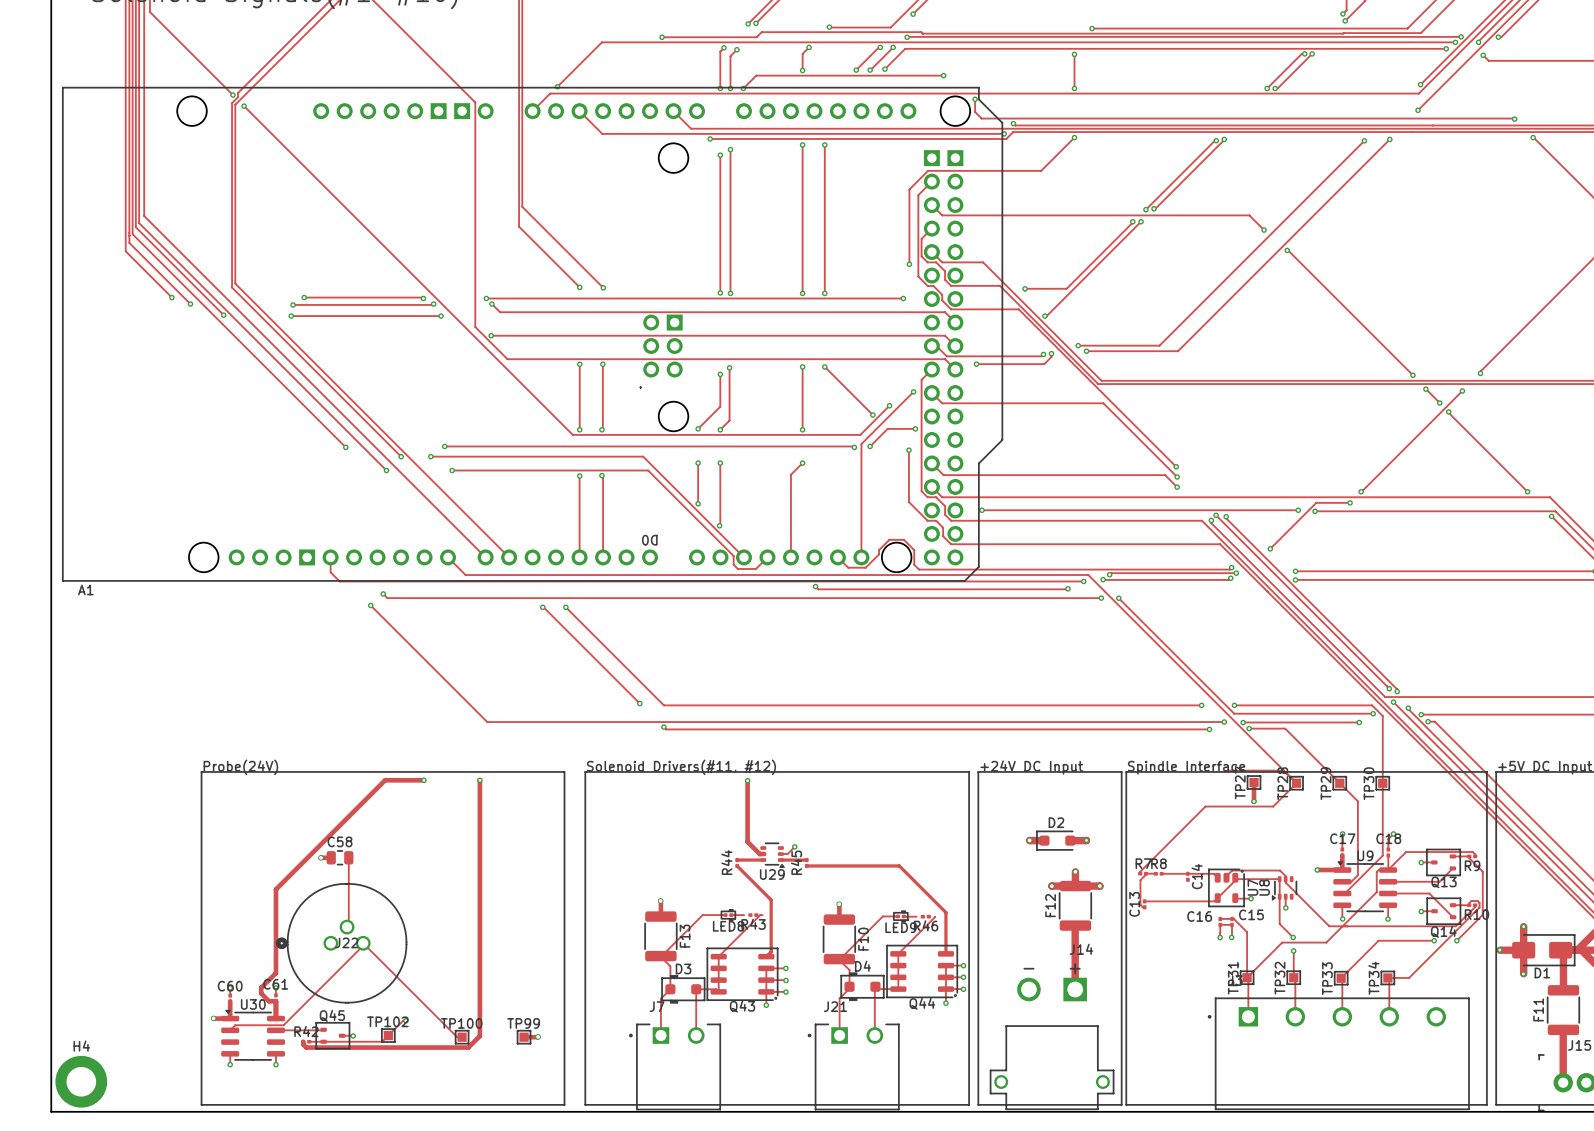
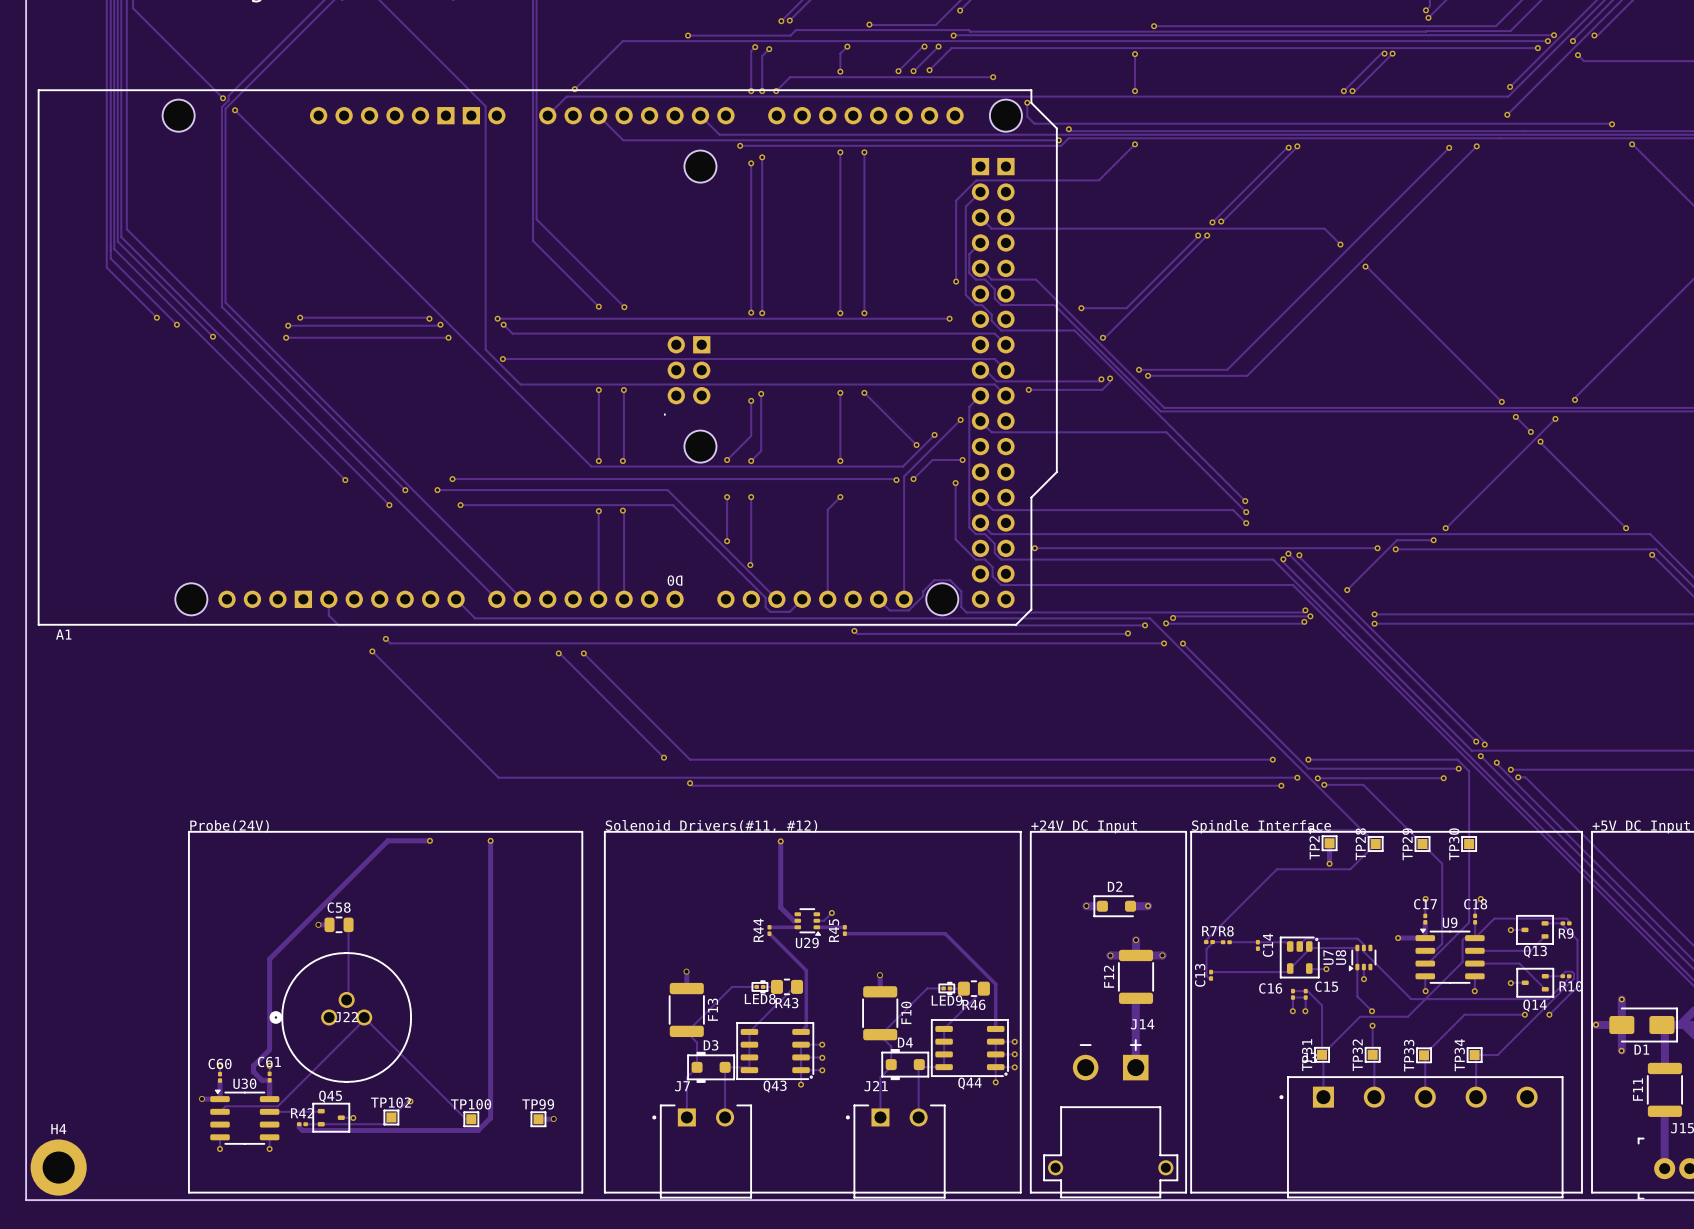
R43 footprint: [748, 913, 759, 917] -> [770, 978, 804, 995]
R46 footprint: [920, 914, 931, 919] -> [957, 980, 990, 997]

